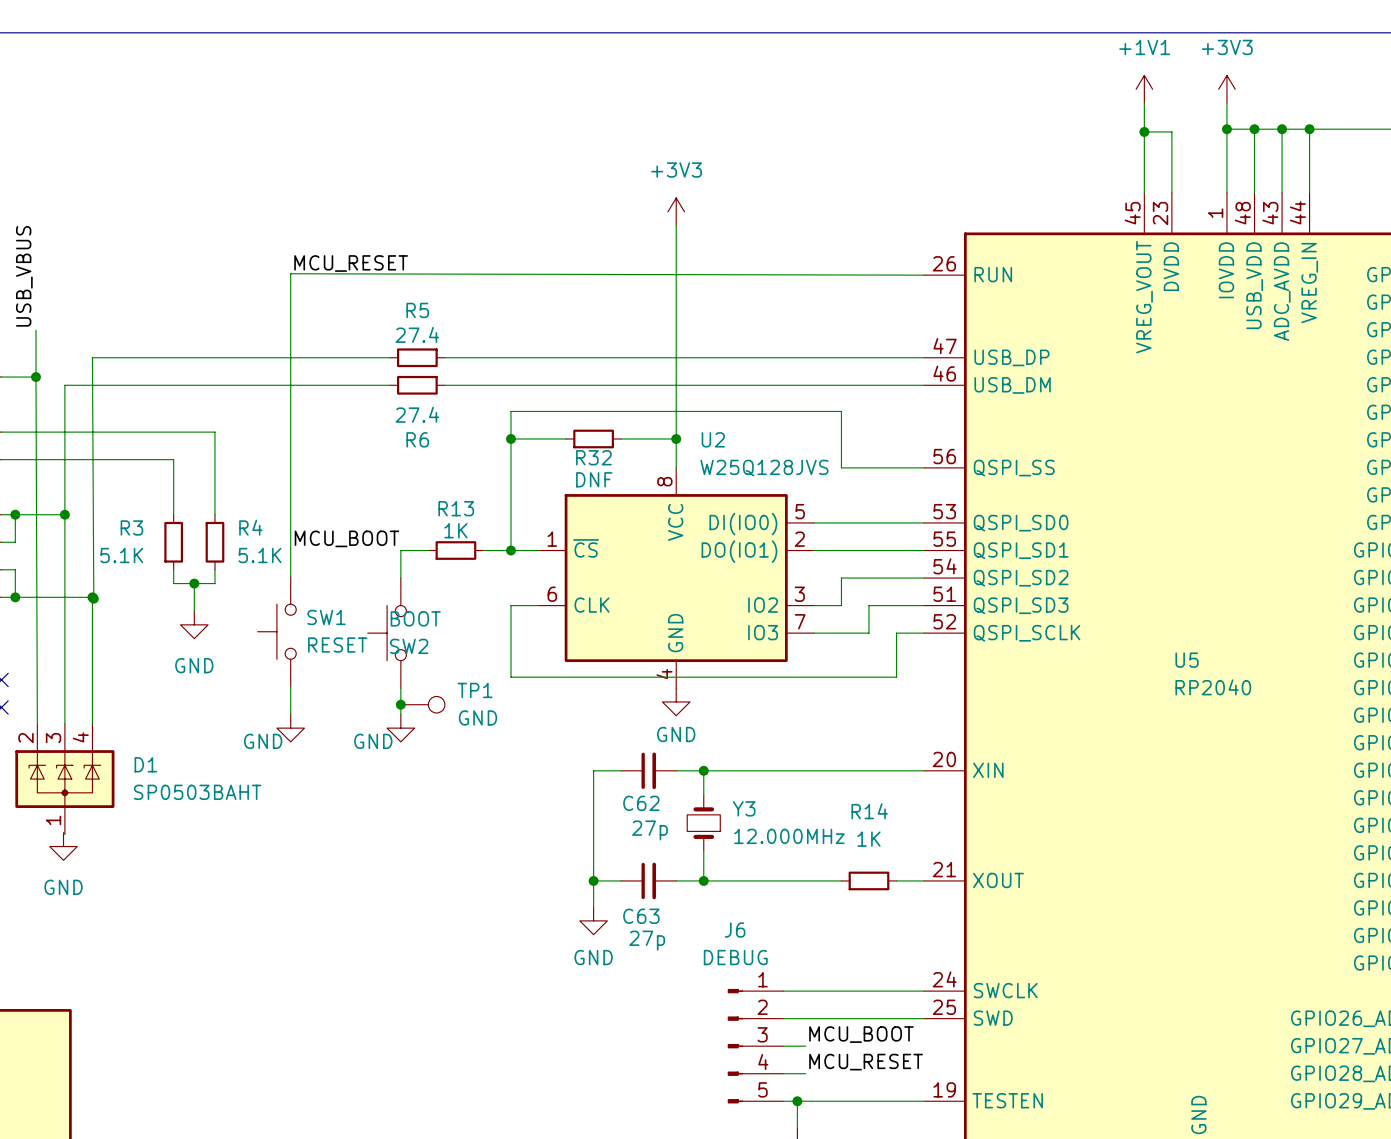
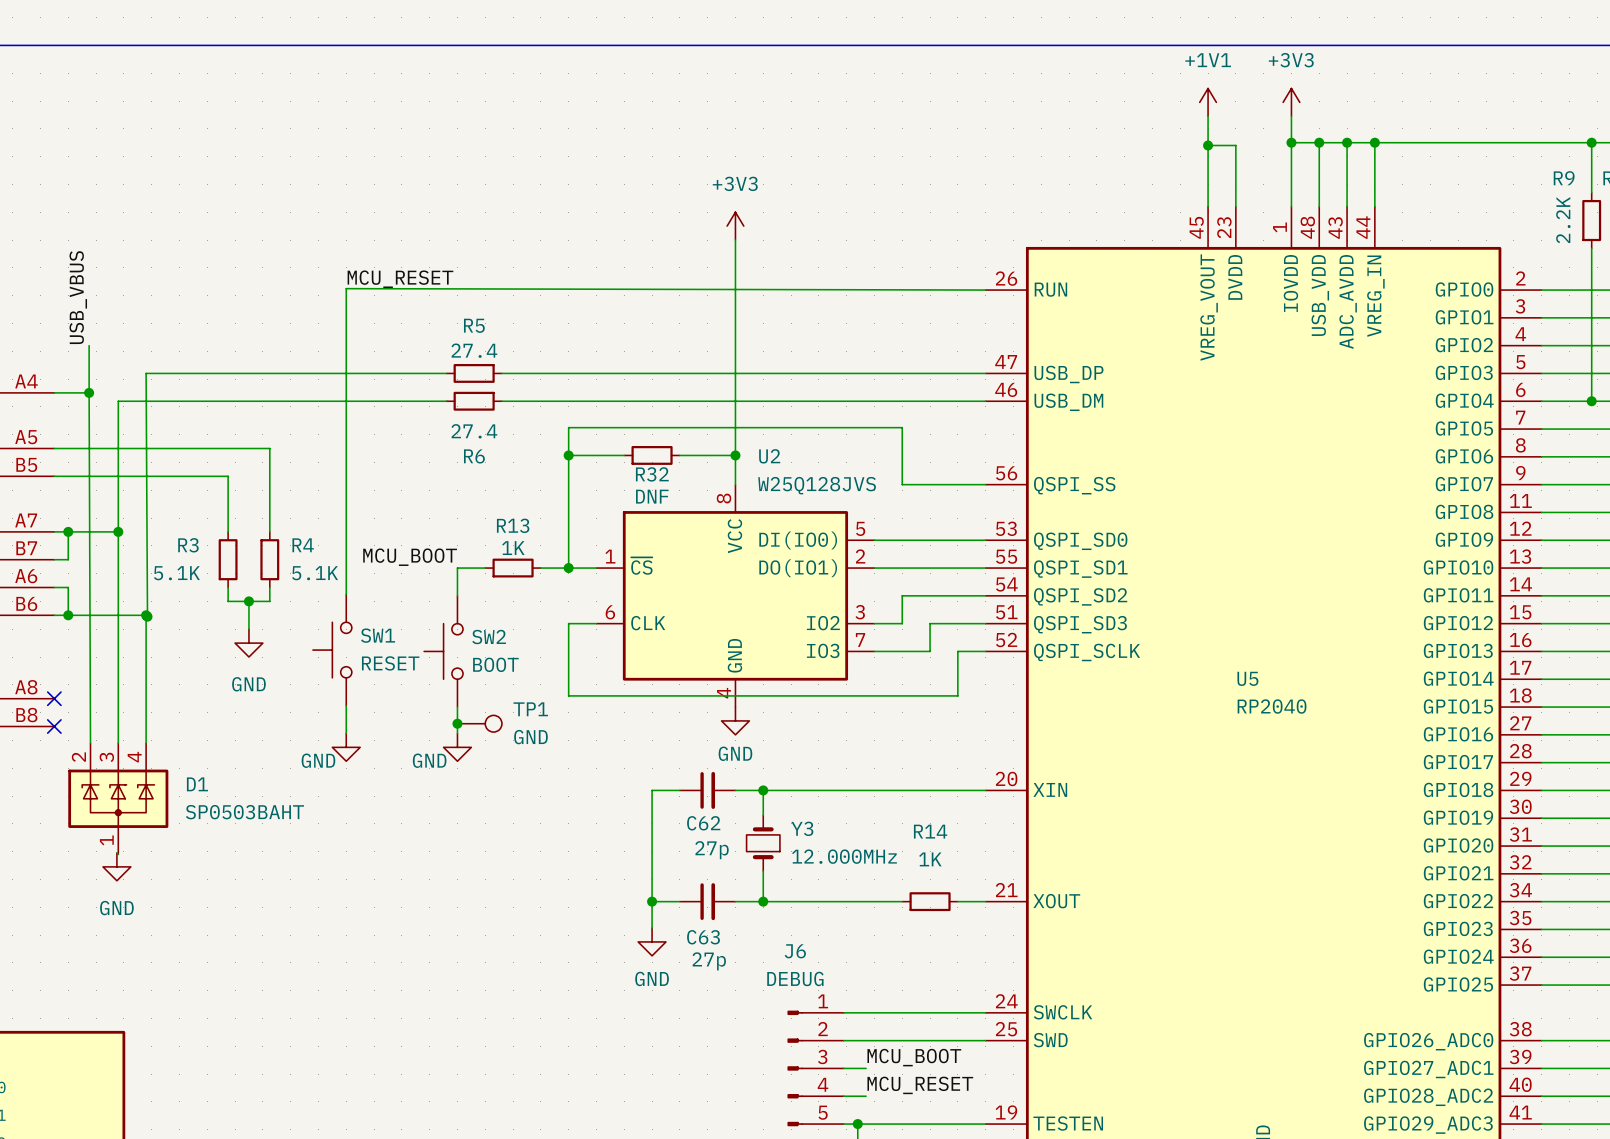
SW2 value position: BOOT (415, 618) -> BOOT (495, 664)
SW2 name position: SW2 (409, 646) -> SW2 (489, 637)

